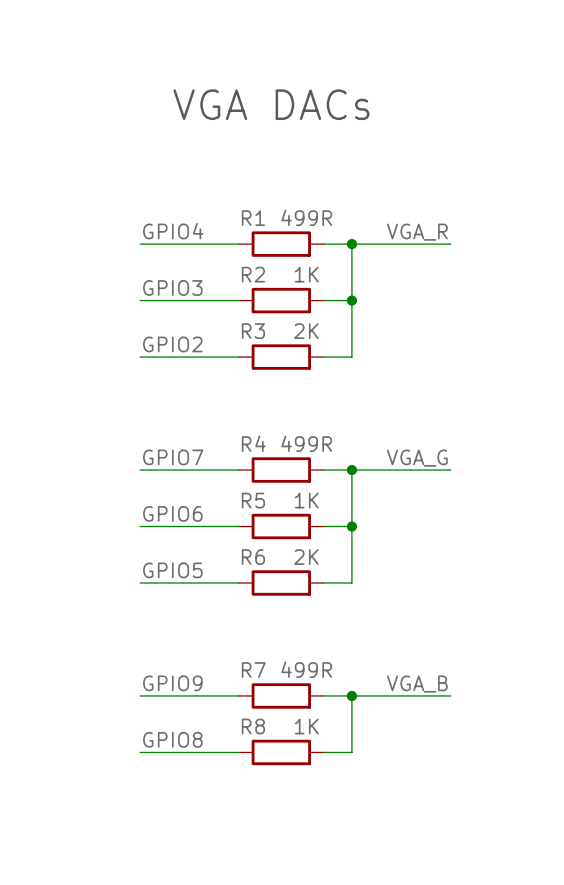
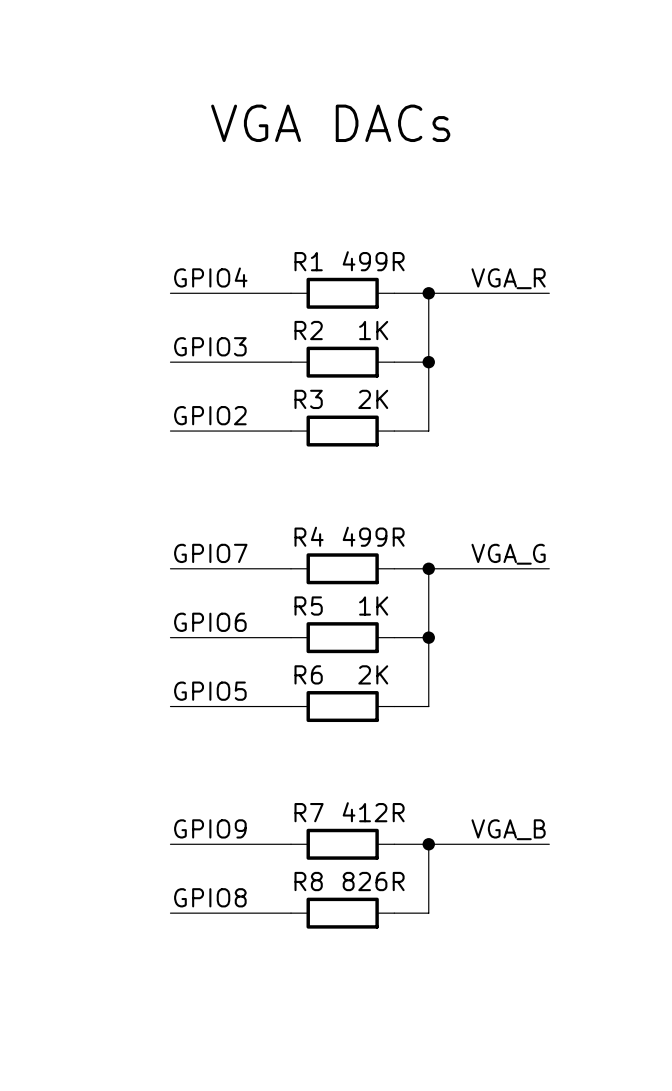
R7 value: 499R (306, 669) -> 412R (373, 812)
R8 value: 1K (306, 726) -> 826R (373, 881)

